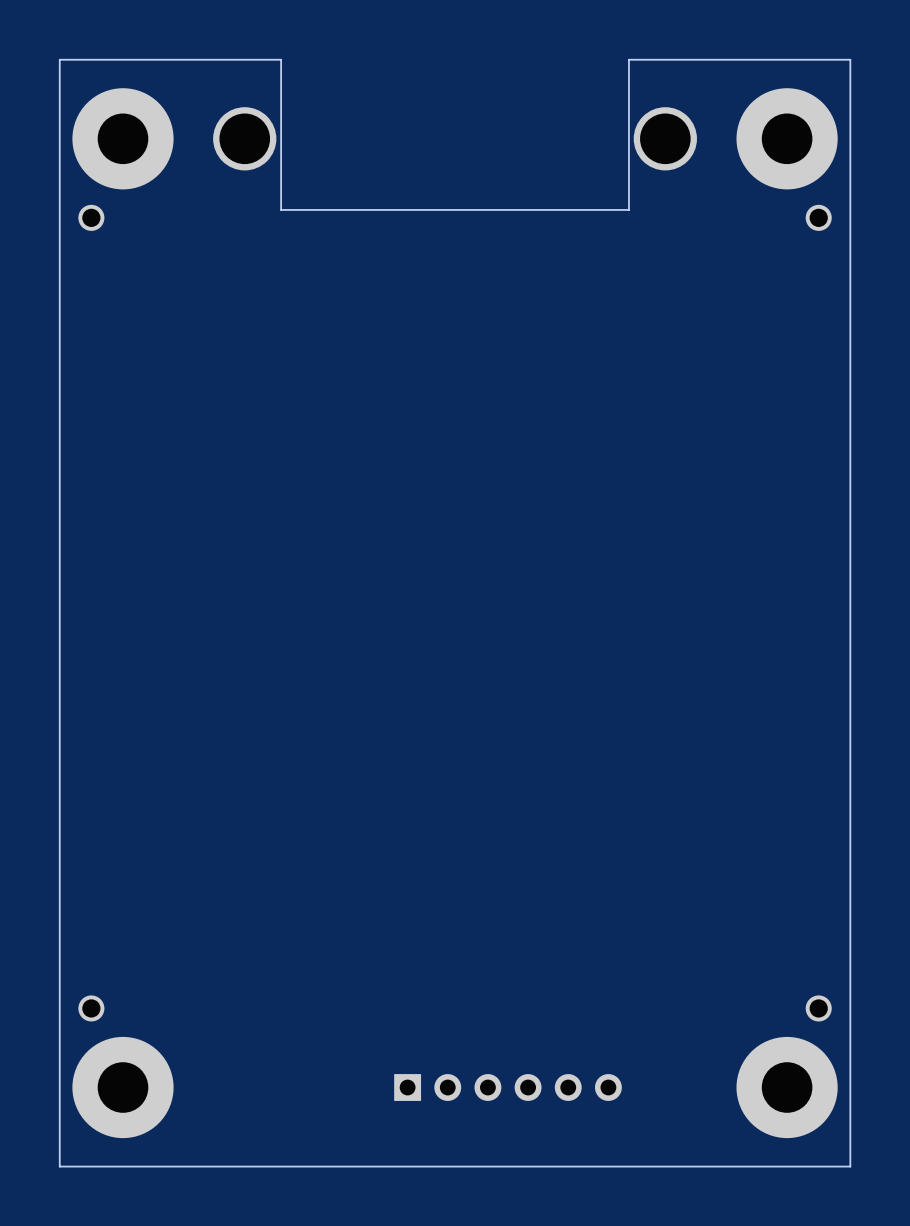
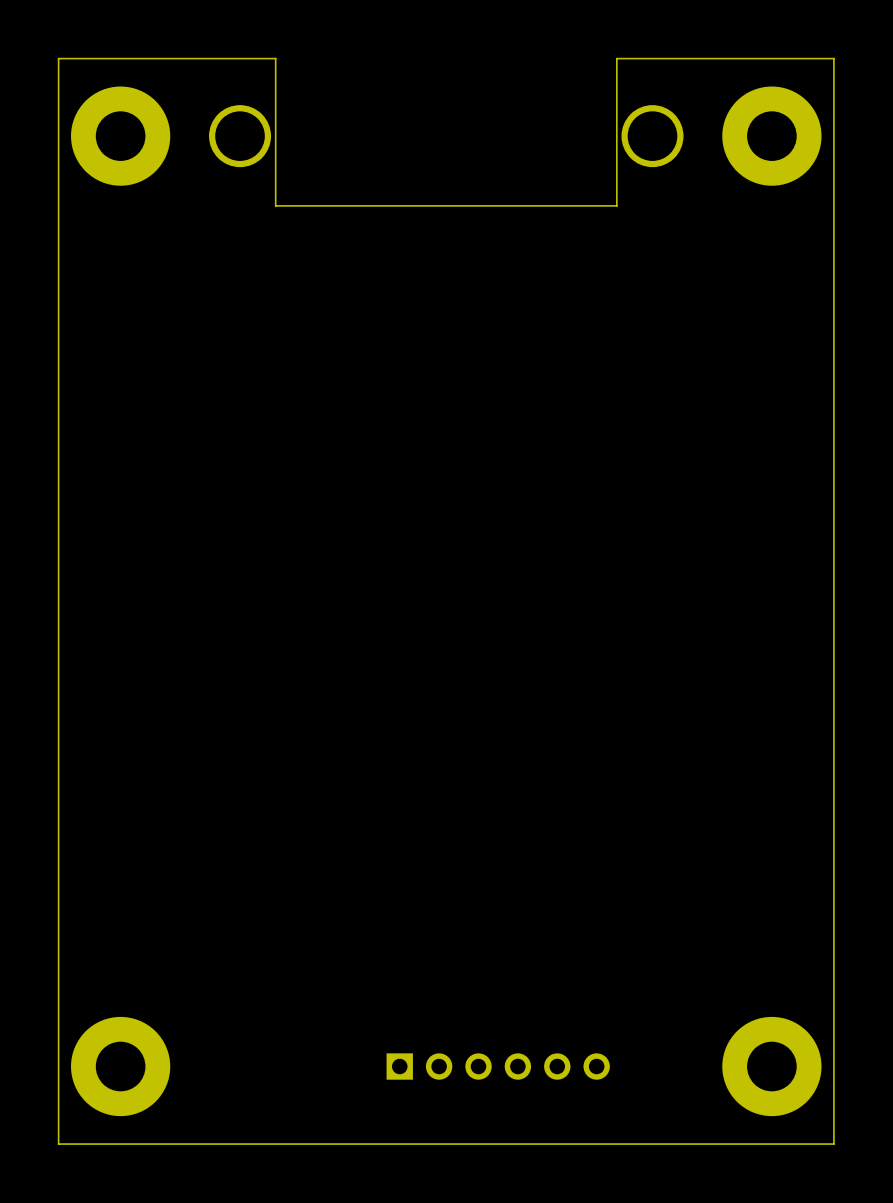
part: (91, 217) -> none
part: (818, 217) -> none
part: (91, 1008) -> none
part: (818, 1008) -> none

